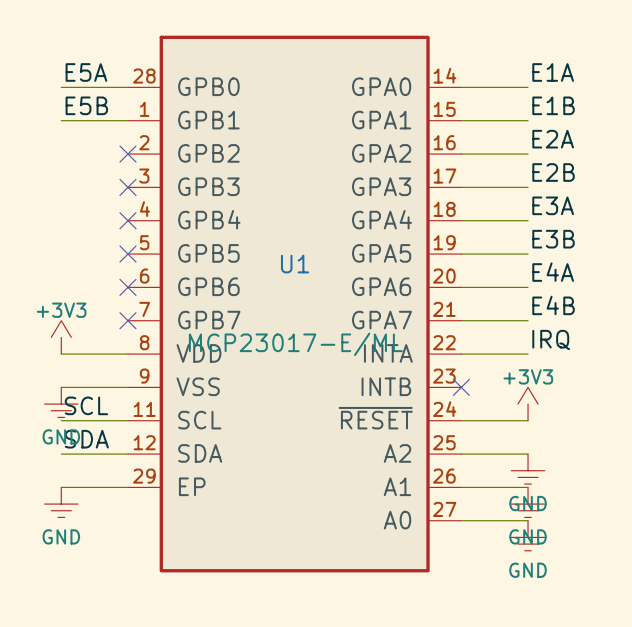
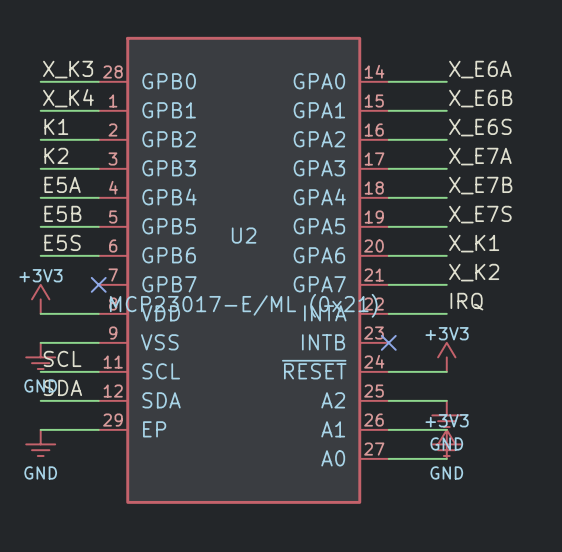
label: E5A (86, 72) -> X_K3 (68, 69)
label: E1A (553, 72) -> X_E6A (480, 69)
label: E5B (86, 105) -> X_K4 (68, 98)
label: E1B (553, 105) -> X_E6B (480, 98)
label: none -> K1 (56, 126)
label: E2A (553, 139) -> X_E6S (480, 127)
wire: none -> (40, 139) (98, 139)
no-connect mark: (127, 154) -> none
label: none -> K2 (56, 155)
label: E2B (553, 172) -> X_E7A (480, 156)
wire: none -> (40, 168) (98, 168)
no-connect mark: (127, 187) -> none
label: none -> E5A (62, 184)
label: E3A (553, 205) -> X_E7B (480, 185)
wire: none -> (40, 197) (98, 197)
no-connect mark: (127, 220) -> none
label: none -> E5B (62, 213)
label: E3B (553, 239) -> X_E7S (480, 214)
wire: none -> (40, 226) (98, 226)
no-connect mark: (127, 254) -> none
U1 name: U1 (295, 264) -> U2 (244, 235)
label: none -> E5S (62, 242)
label: E4A (553, 272) -> X_K1 (474, 243)
wire: none -> (40, 255) (98, 255)
no-connect mark: (127, 287) -> none
label: E4B (553, 305) -> X_K2 (474, 272)
U1 value: MCP23017-E/ML (295, 344) -> MCP23017-E/ML (0x21) (243, 305)
power symbol: none -> +3V3 (446, 444)
power symbol: GND (528, 535) -> none

